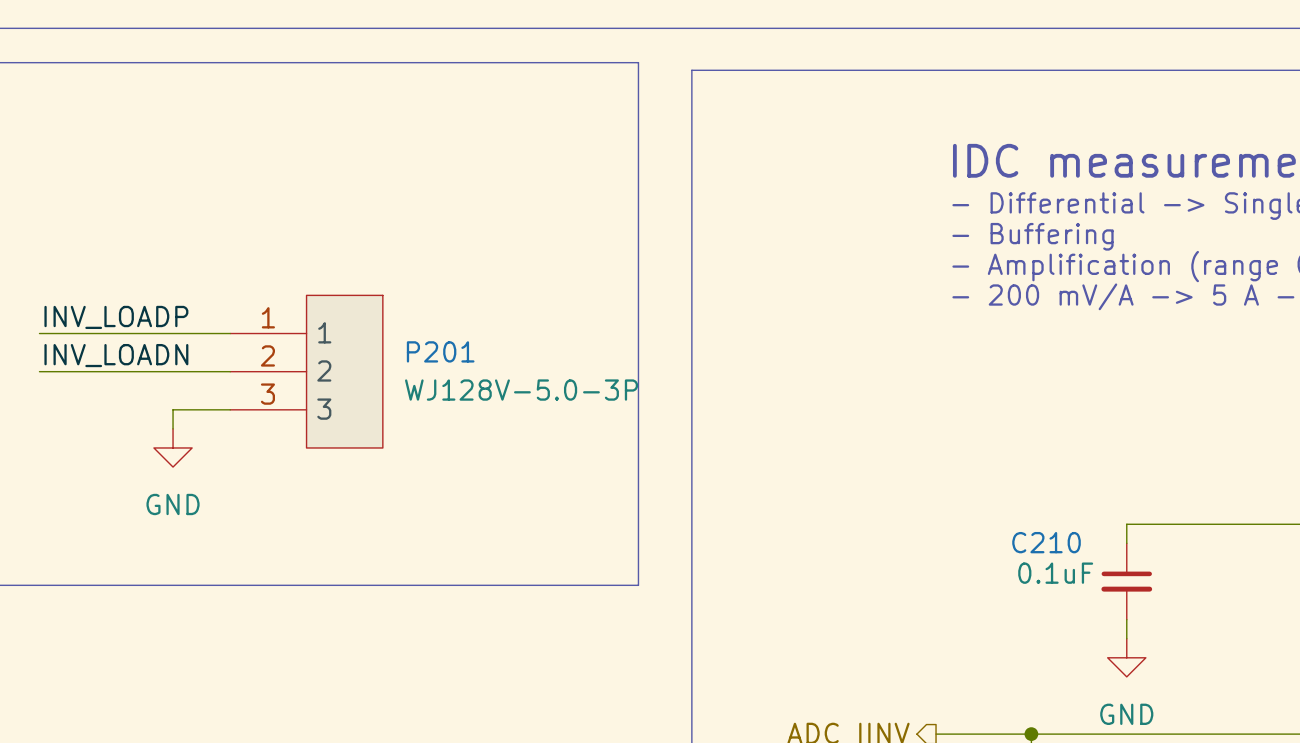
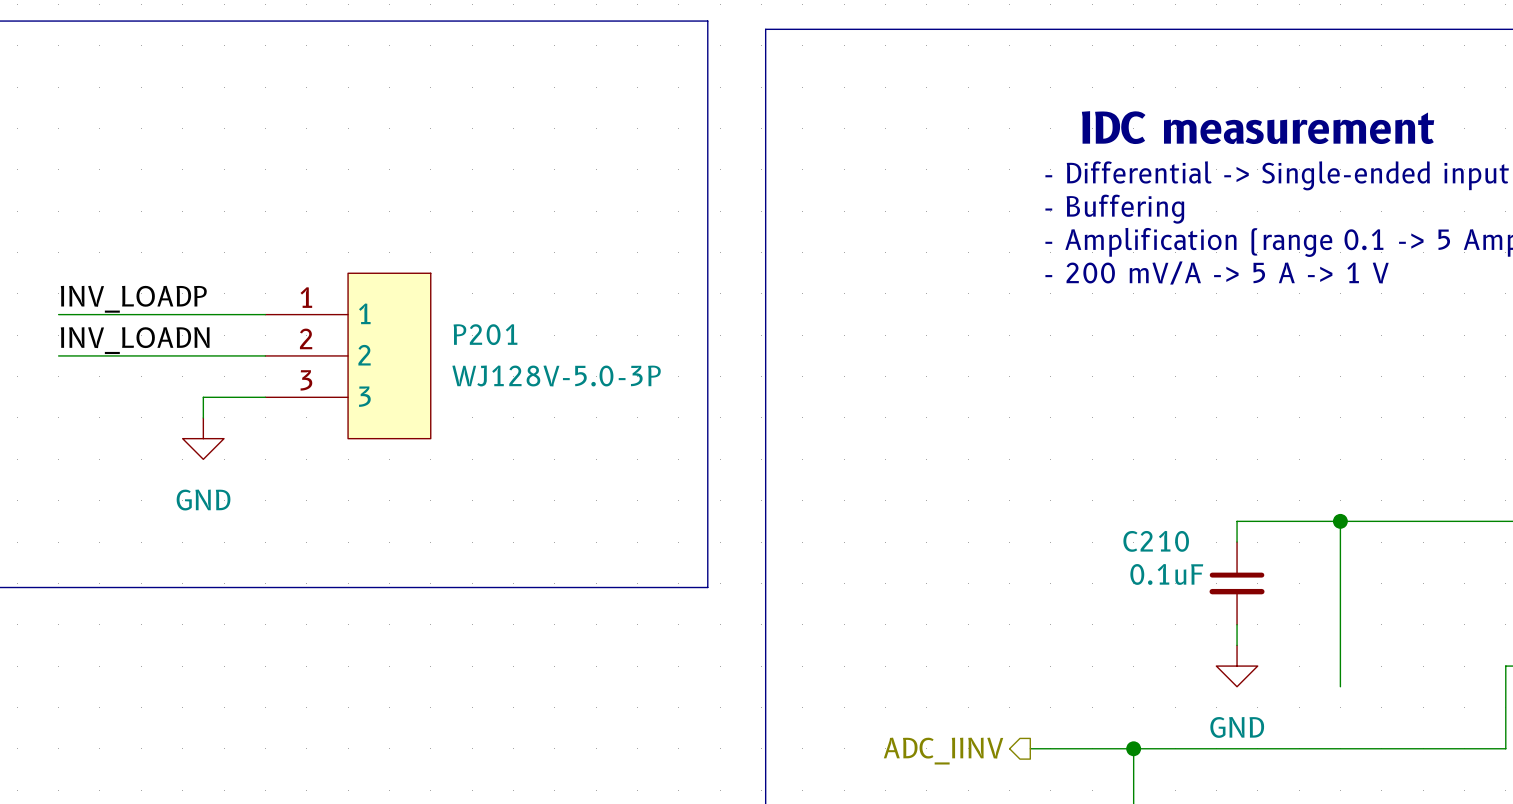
wire: none -> (1340, 521) (1340, 686)
junction: none -> (1340, 521)

